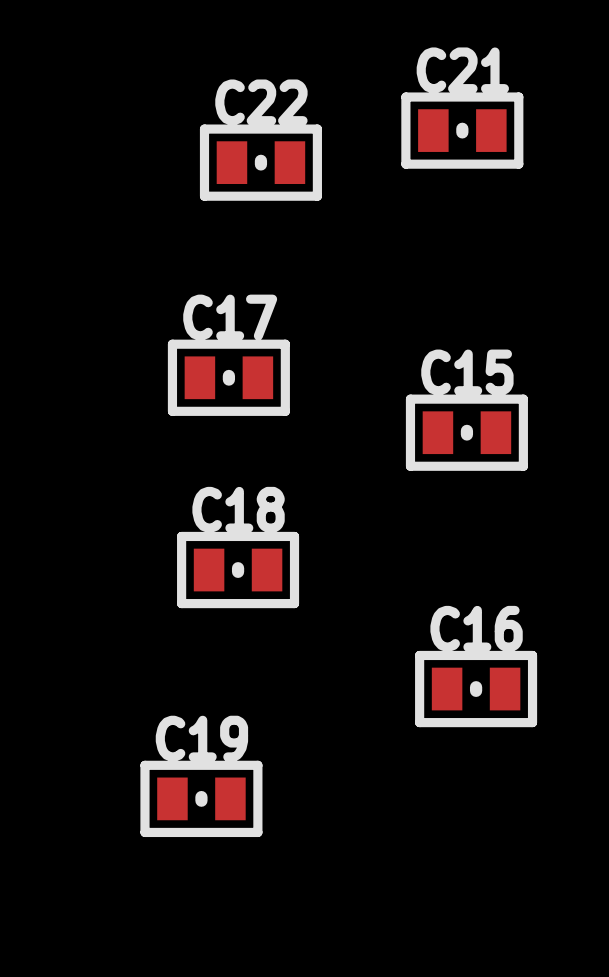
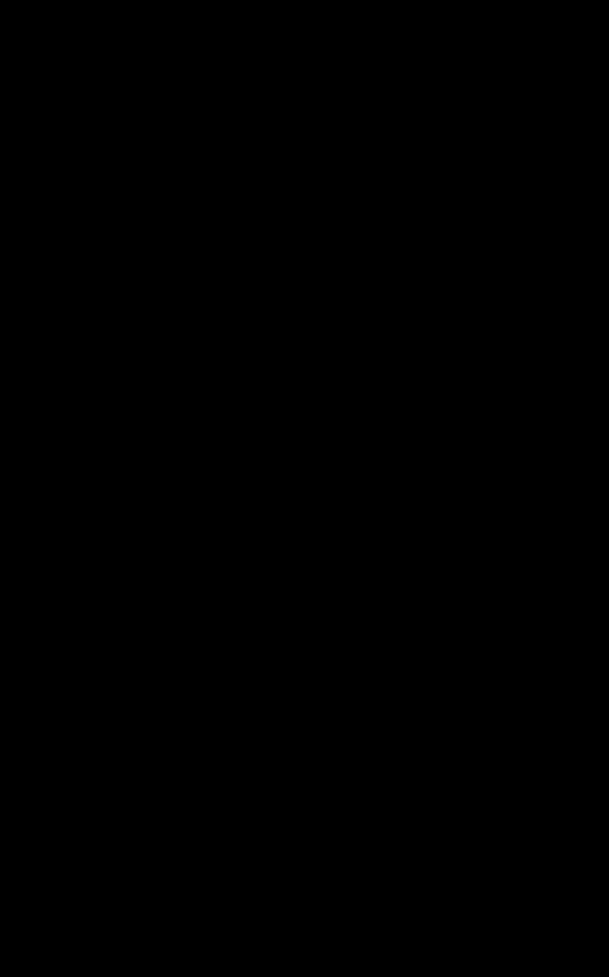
C21: (462, 130) -> none
C22: (260, 162) -> none
C17: (228, 377) -> none
C15: (466, 432) -> none
C18: (238, 570) -> none
C16: (476, 689) -> none
C19: (201, 798) -> none

